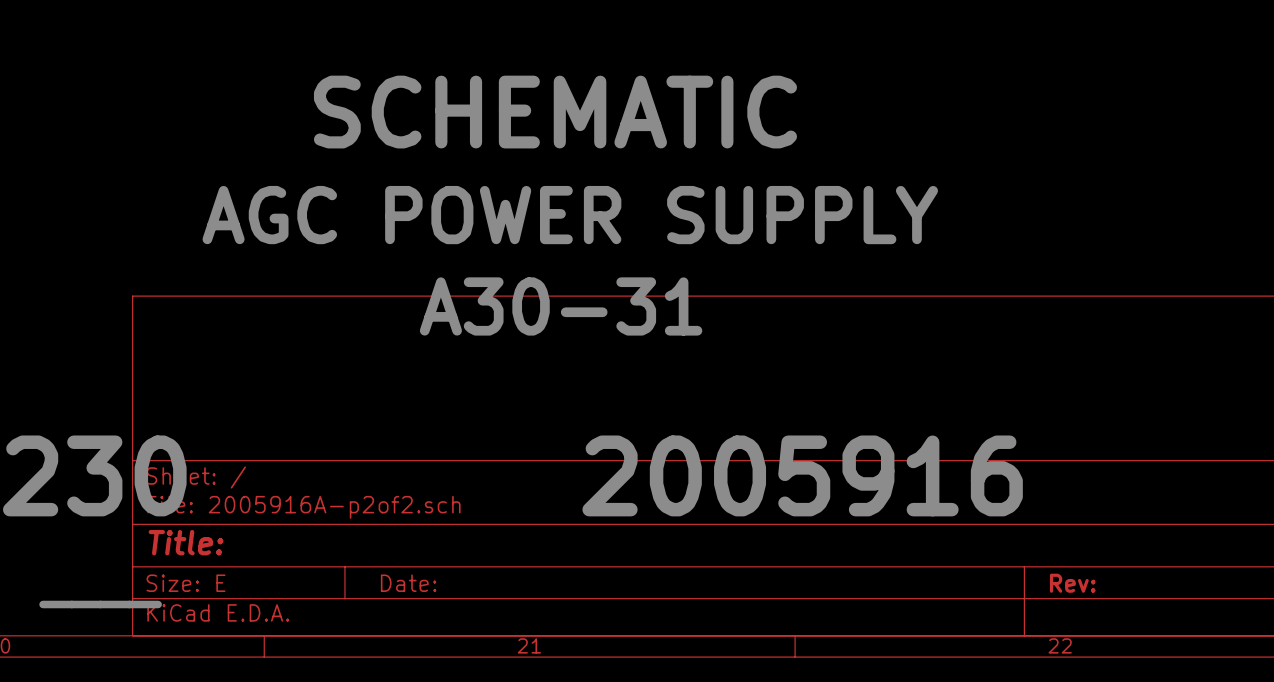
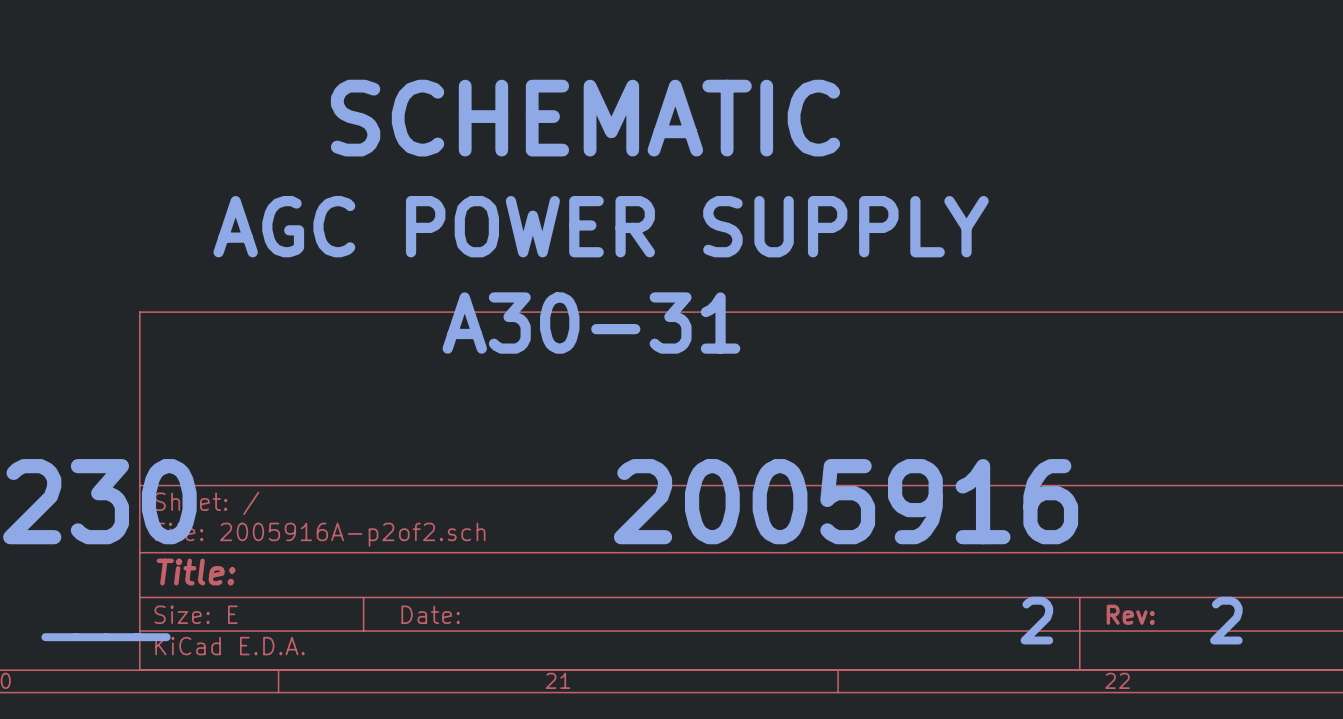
text: none -> 2 2 (1131, 620)

